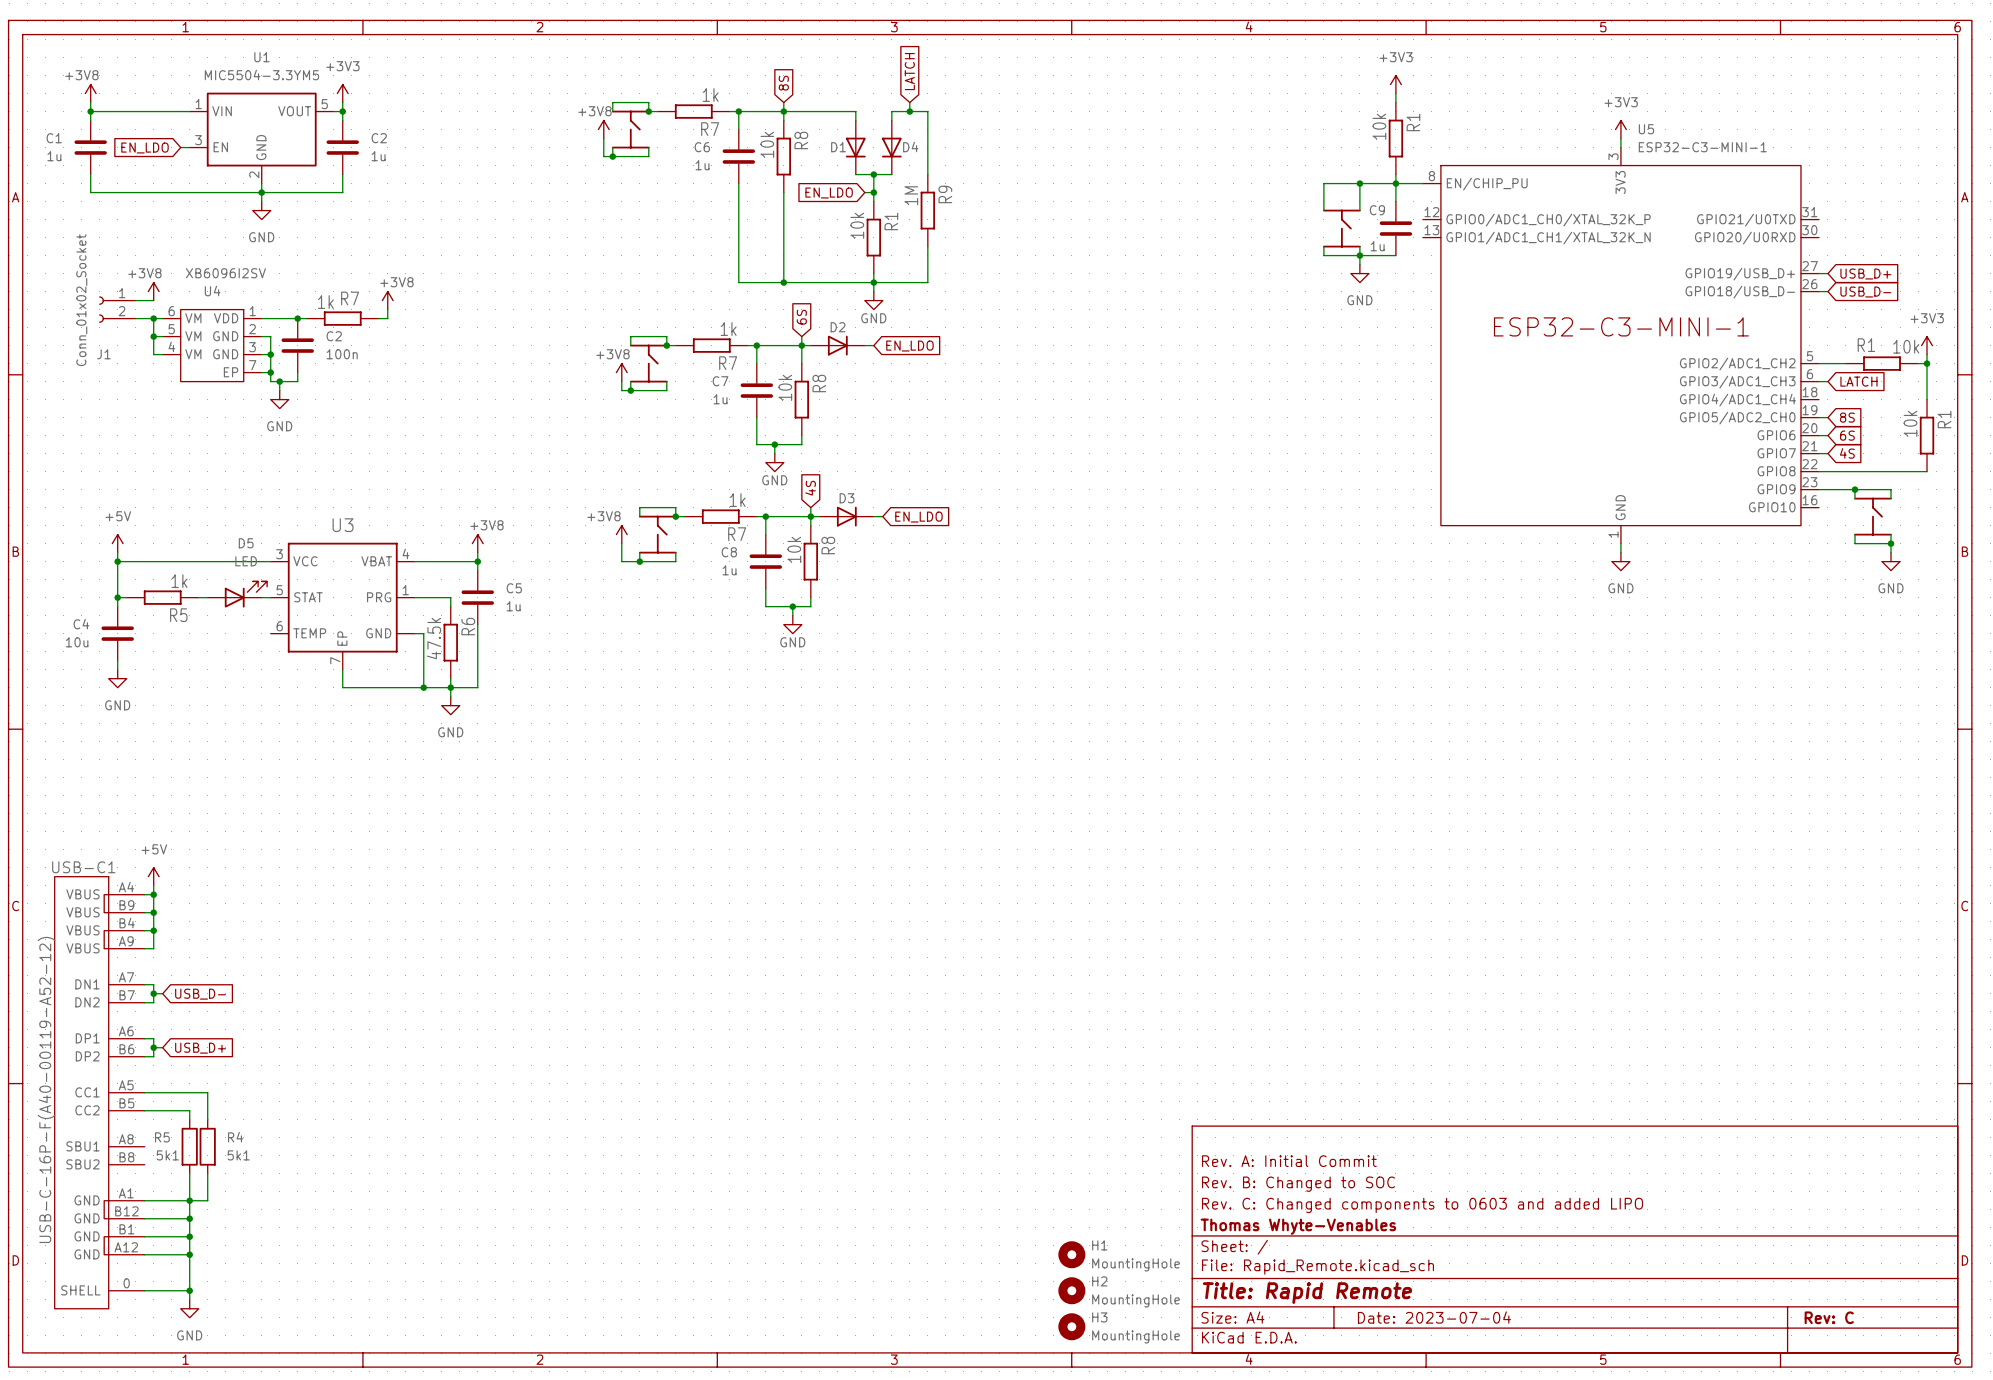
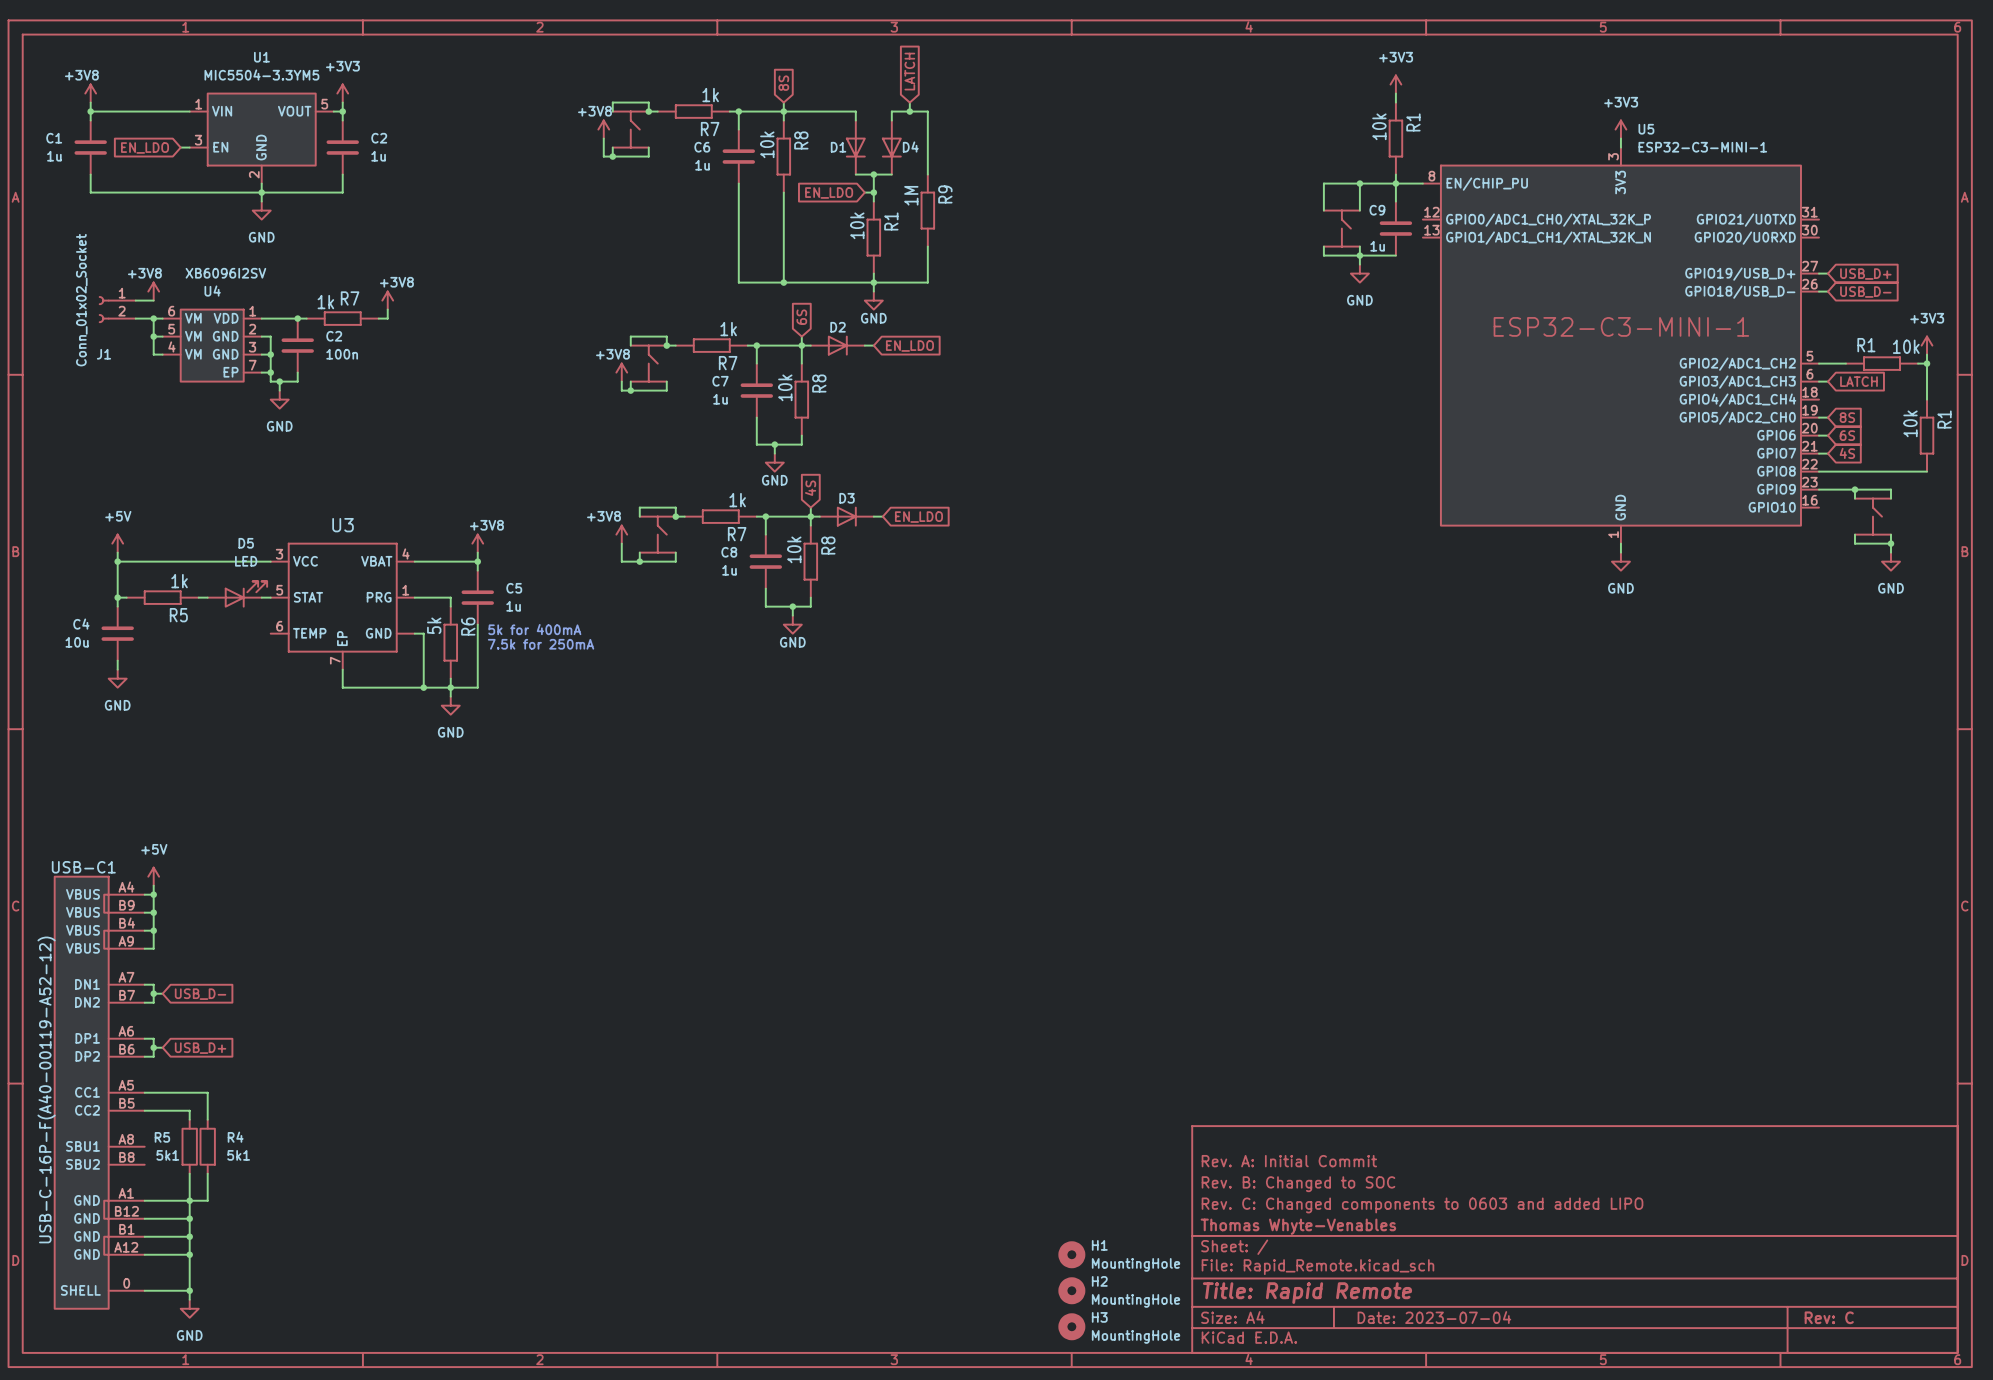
text: none -> 5k for 400mA (534, 629)
R6 value: 47.5k (433, 638) -> 5k (434, 625)
text: none -> 7.5k for 250mA (541, 644)

